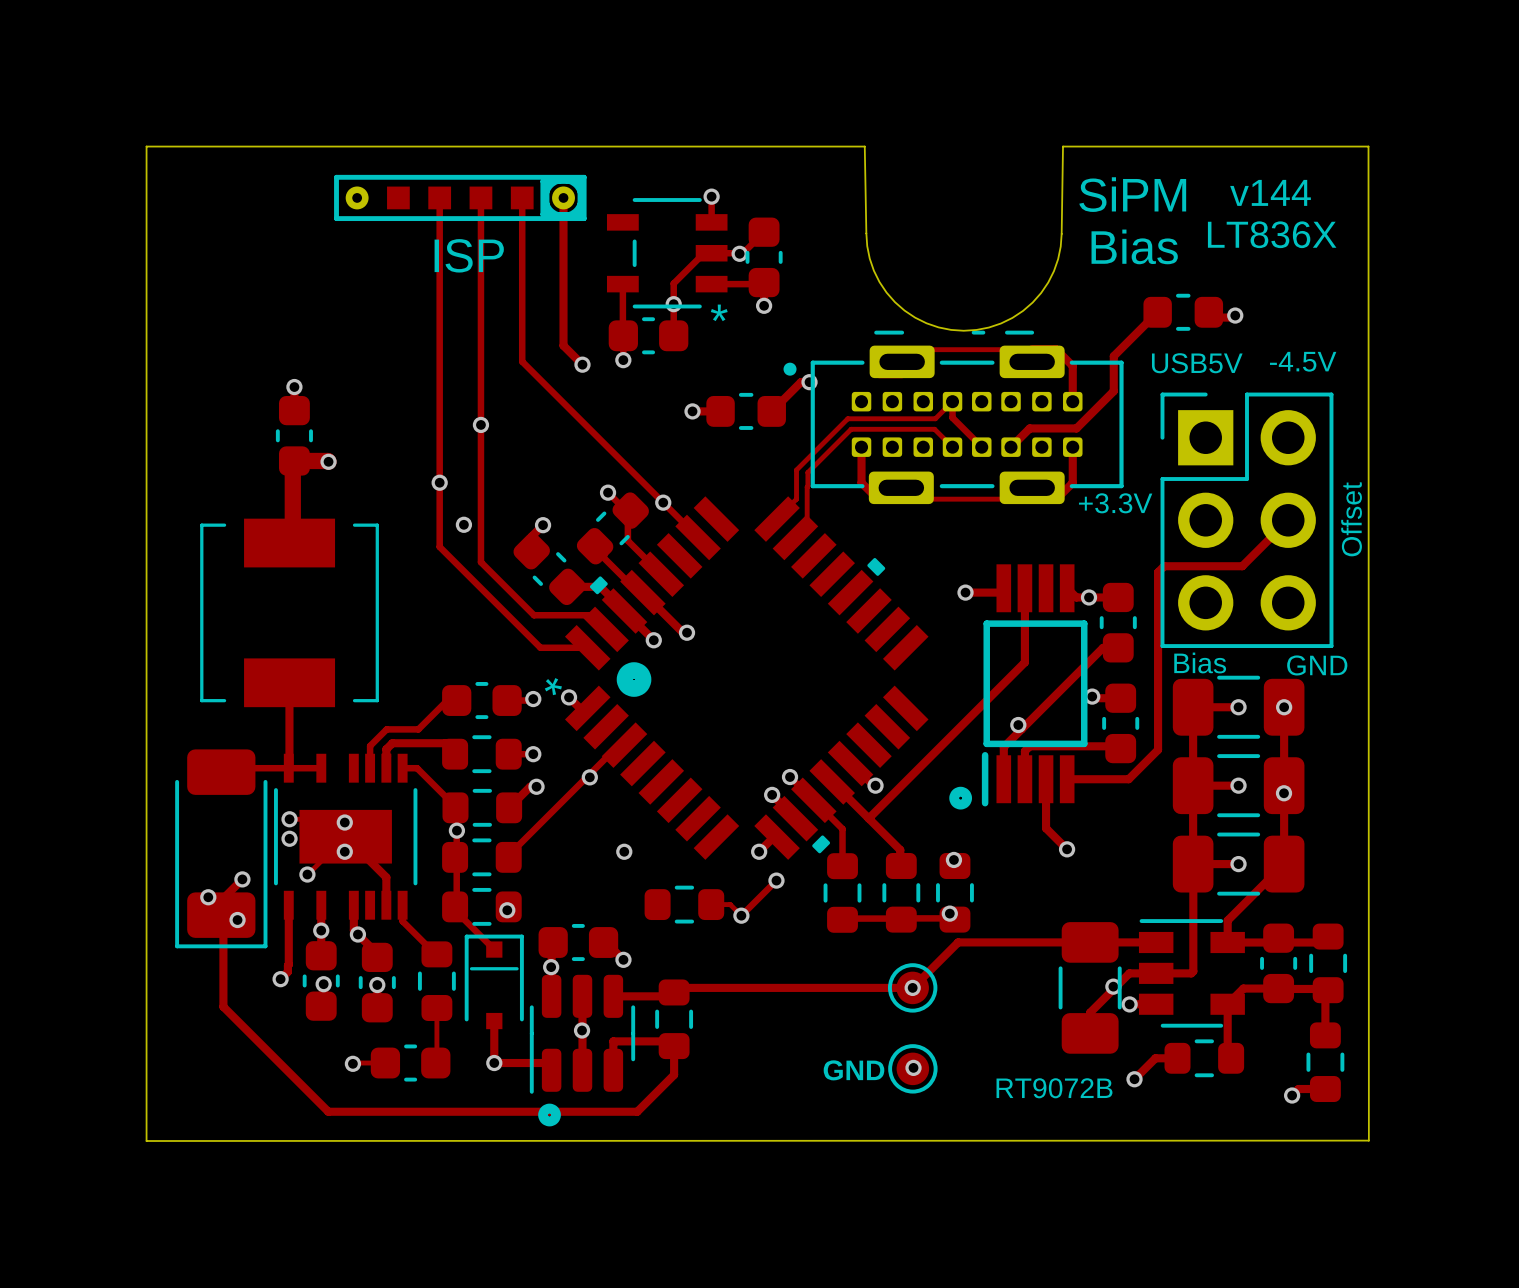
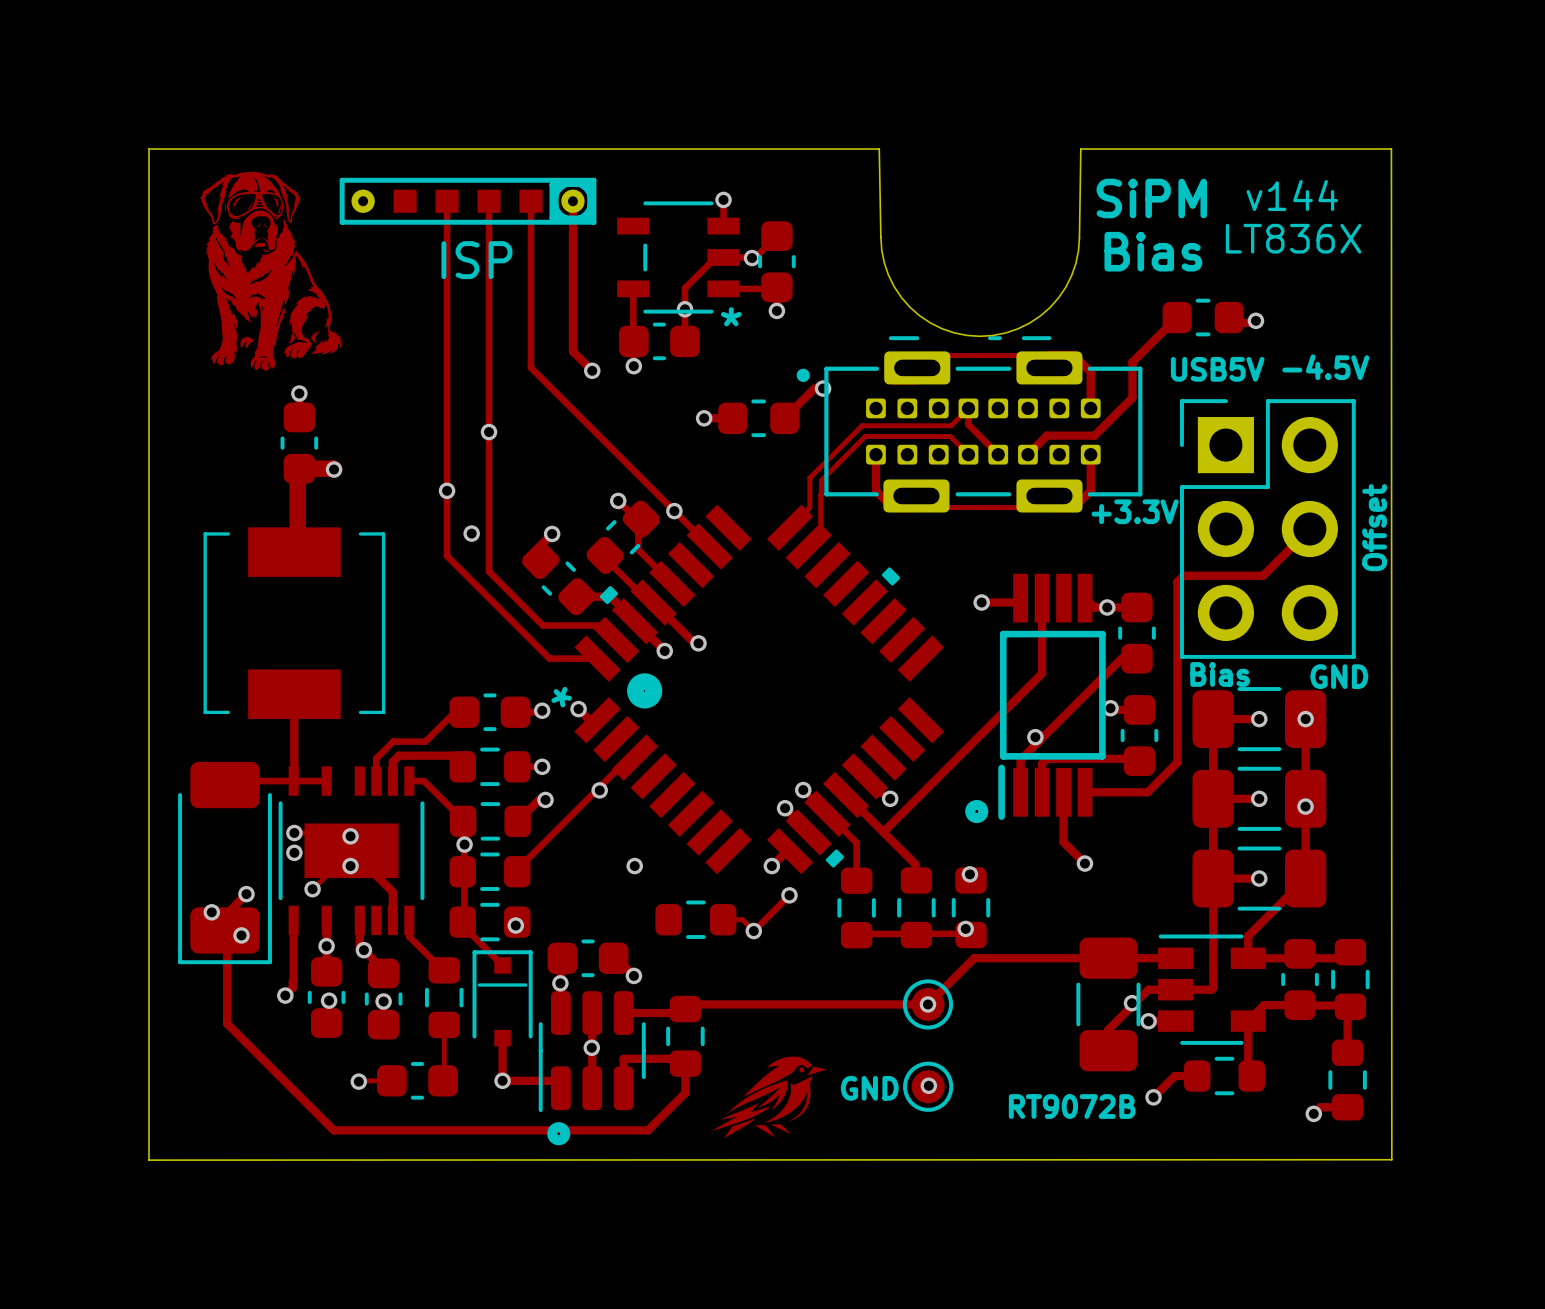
drawing: none -> [200, 172, 343, 371]
drawing: none -> [711, 1056, 826, 1139]

